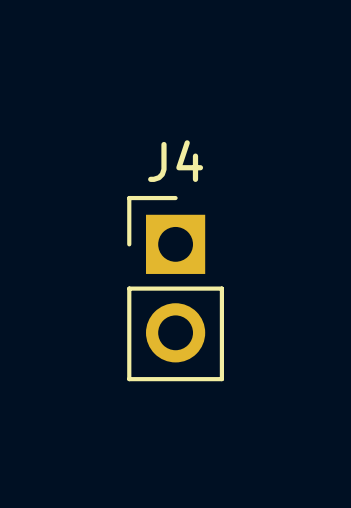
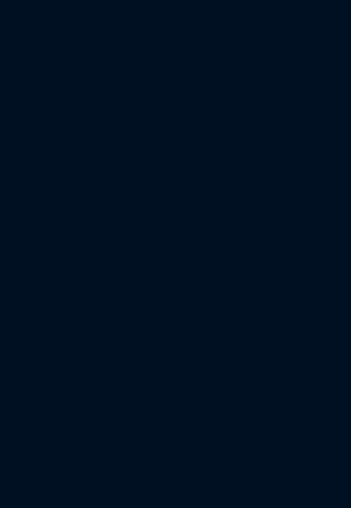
J4: (175, 288) -> none

